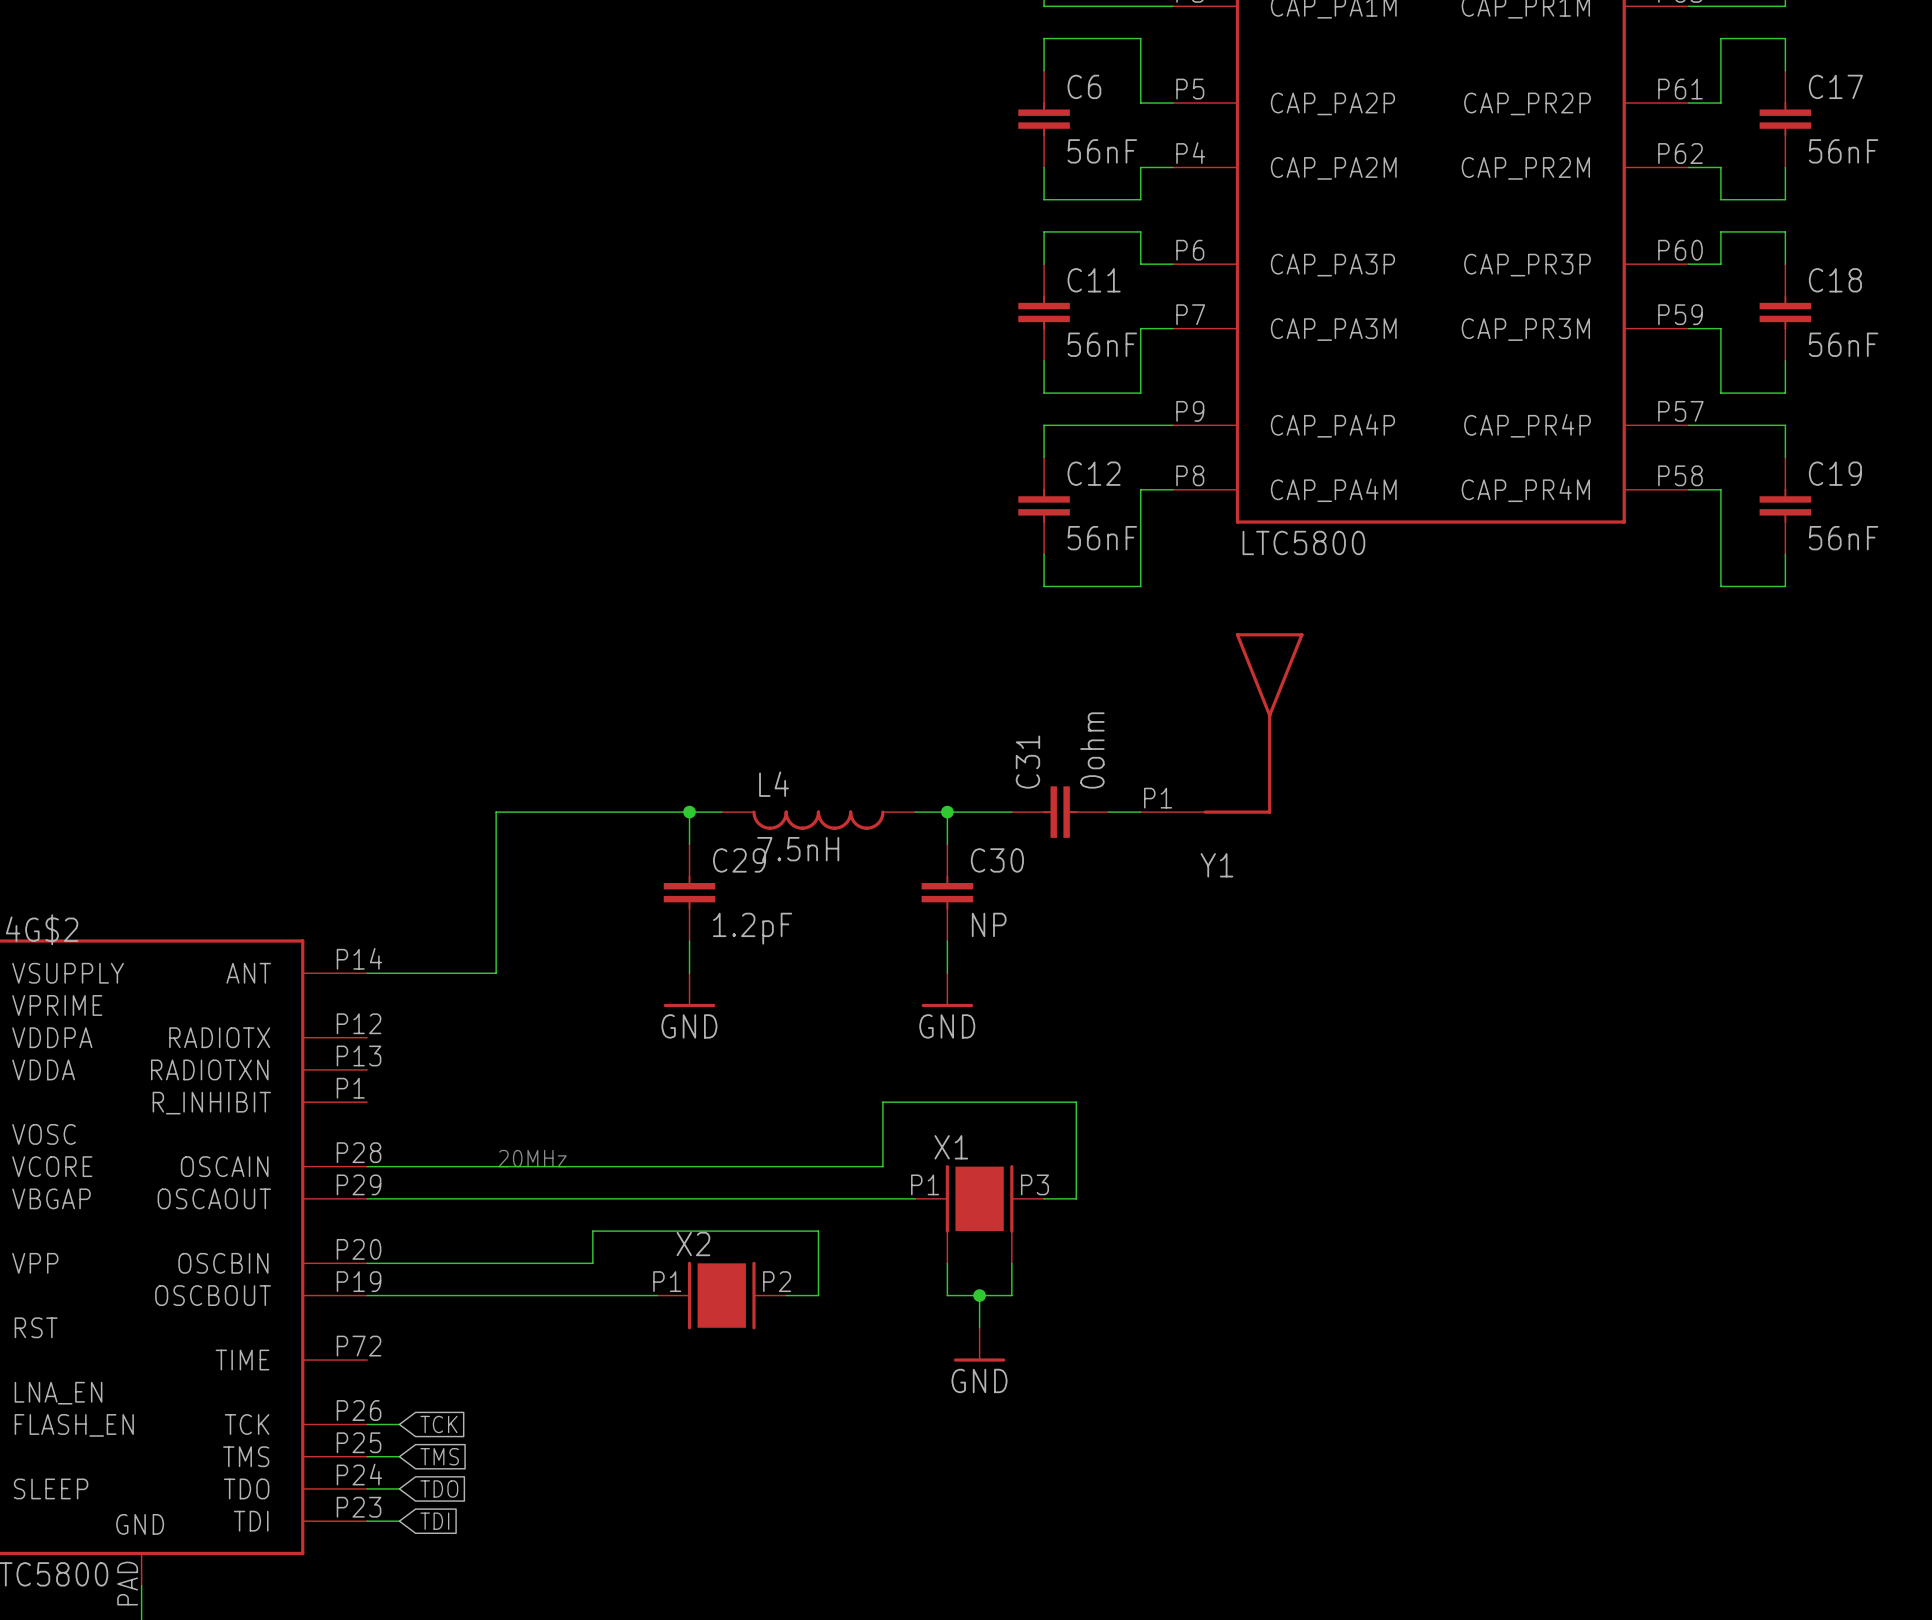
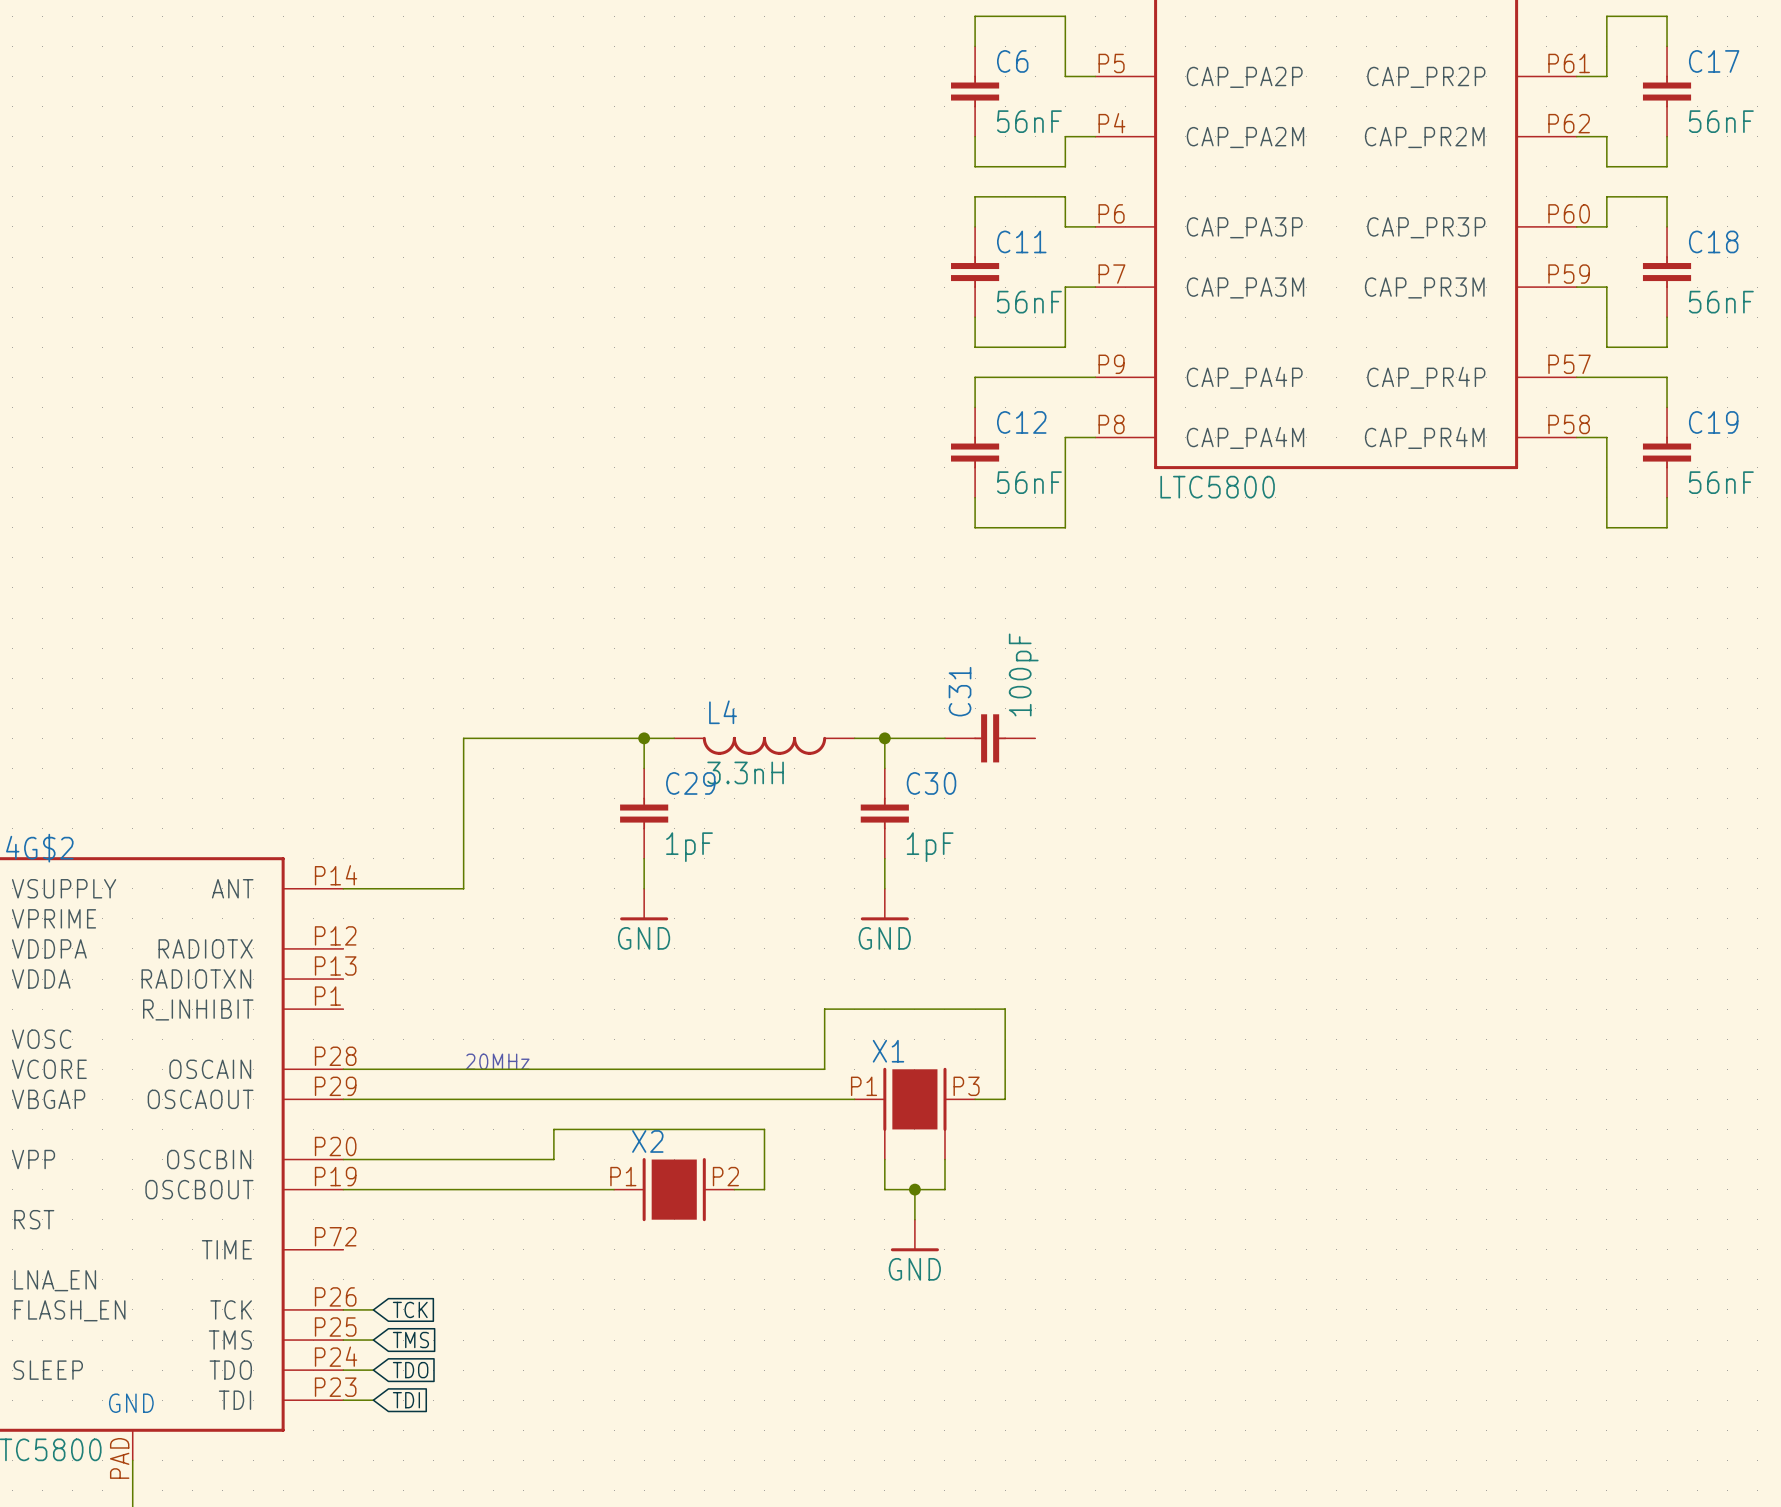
Y1: (1222, 723) -> none
C31 value: 0ohm (1092, 750) -> 100pF (1023, 674)
wire: (1108, 812) (1140, 812) -> none
L4 value: 7.5nH (798, 849) -> 3.3nH (745, 772)
C30 value: NP (989, 924) -> 1pF (930, 847)
C29 value: 1.2pF (752, 928) -> 1pF (689, 847)

